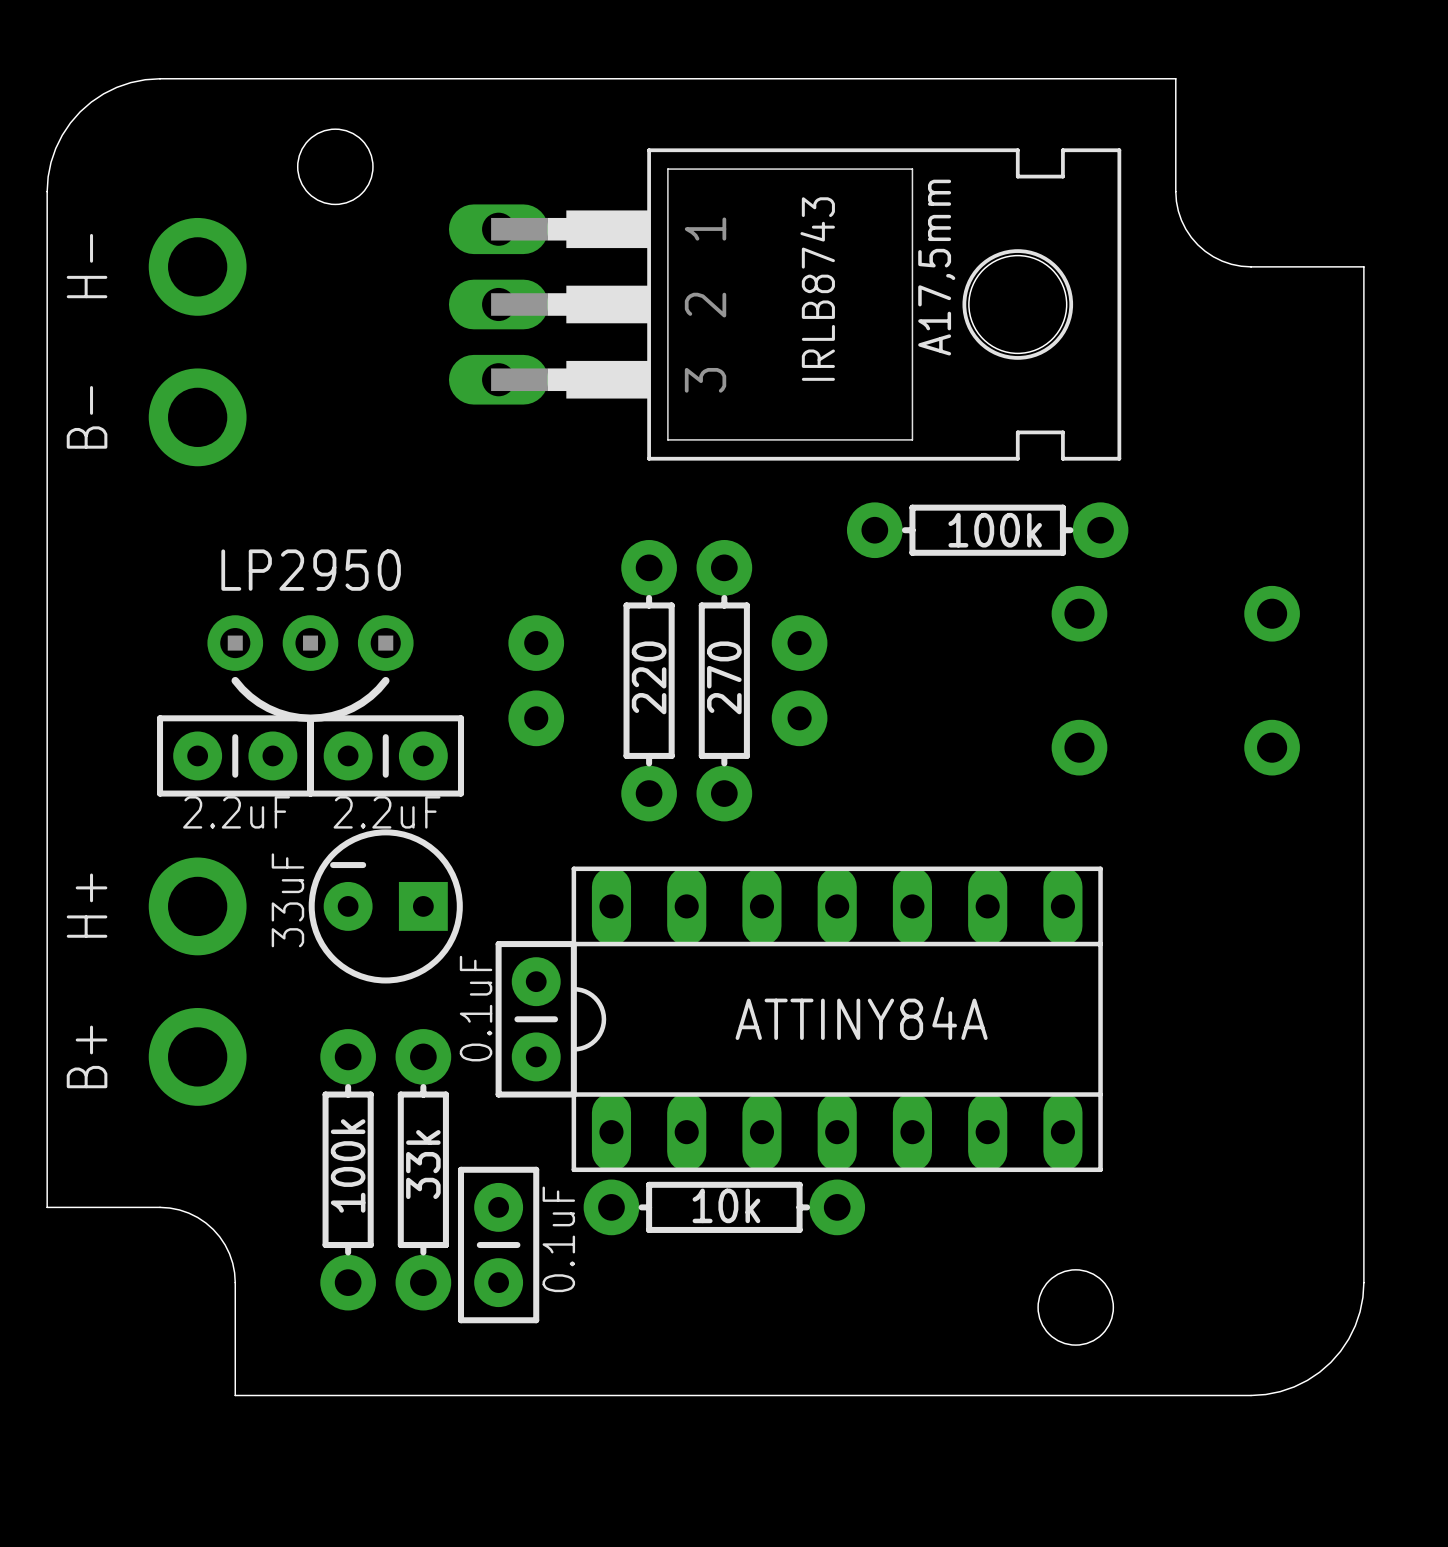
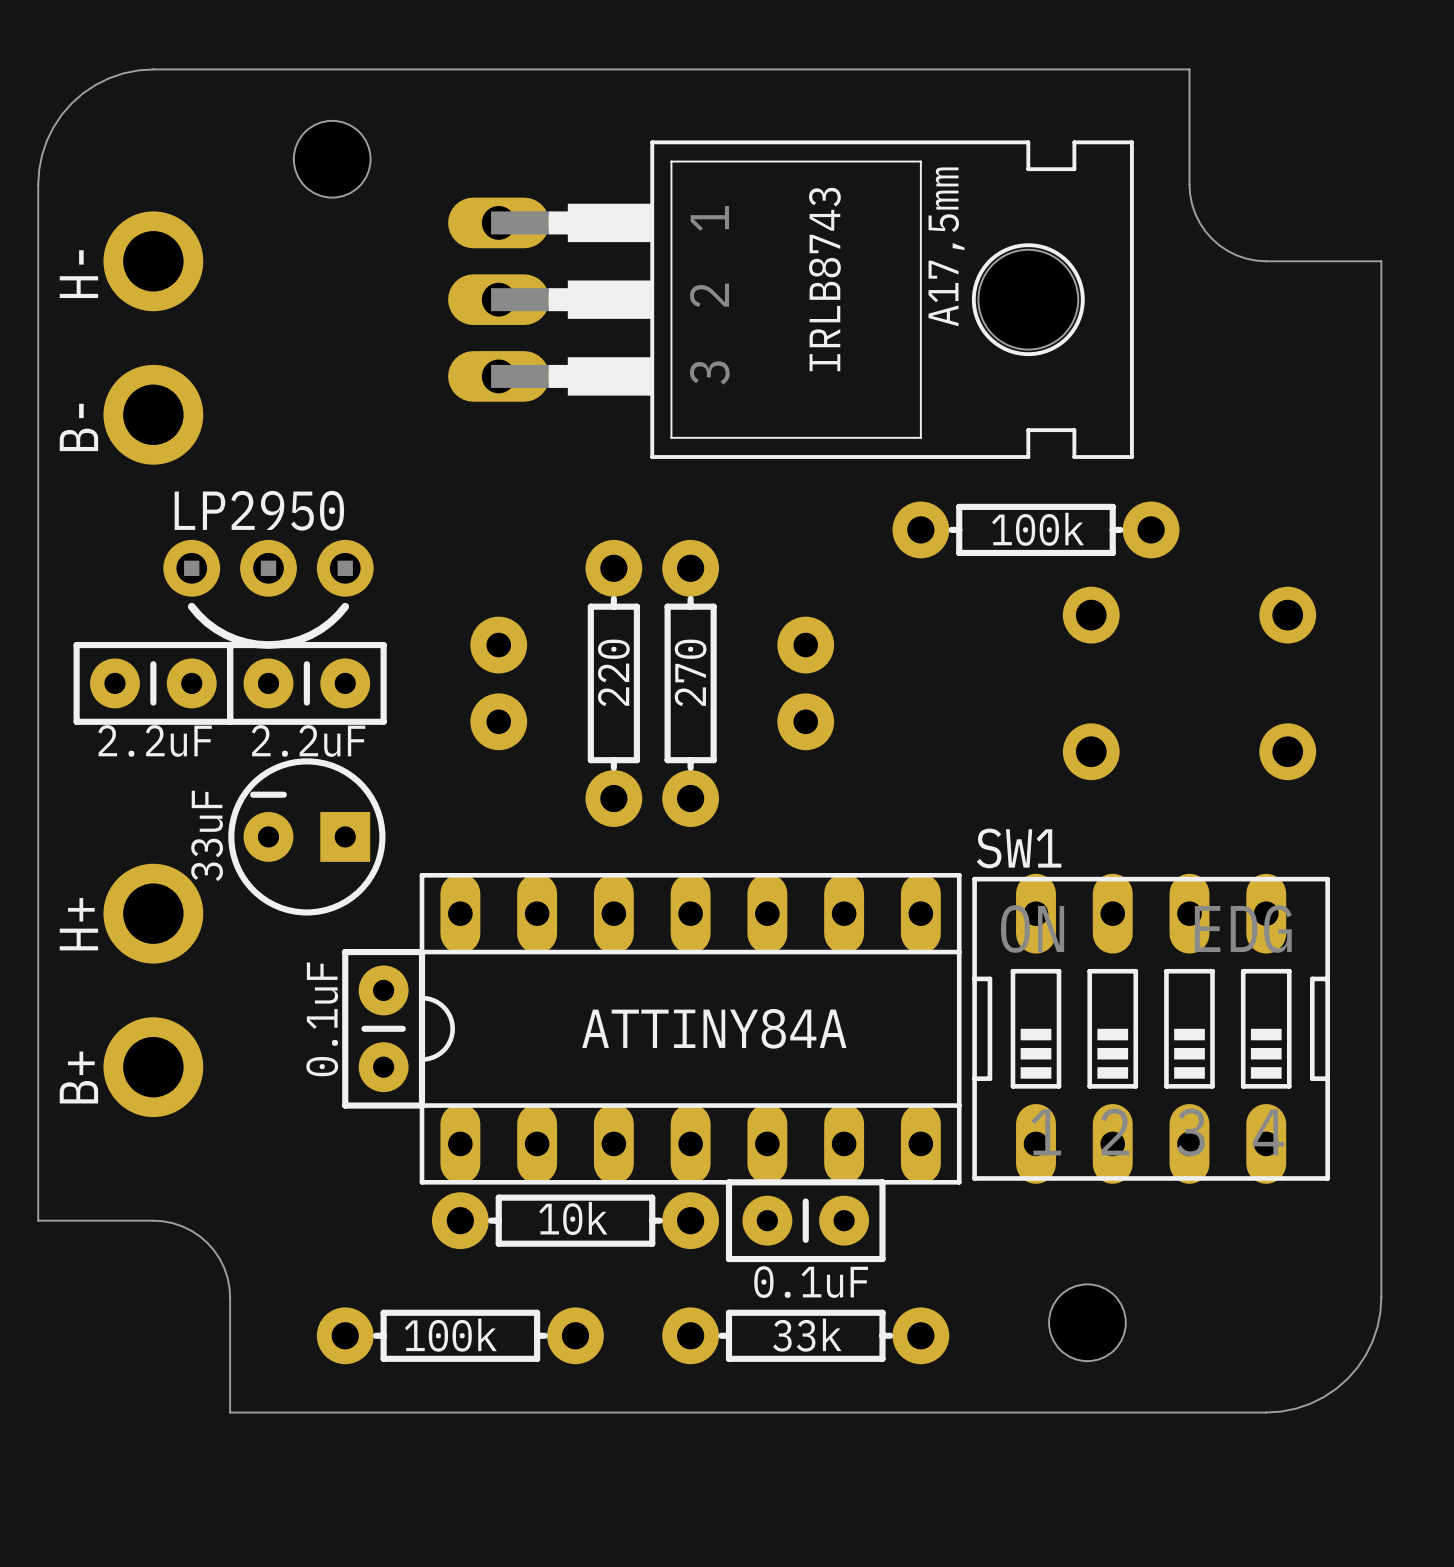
H- position: (197, 266) -> (153, 261)
B- position: (197, 417) -> (153, 414)
part position: (987, 530) -> (1035, 529)
LP2950 name position: LP2950 (311, 570) -> LP2950 (259, 510)
LP2950 position: (310, 643) -> (268, 568)
part: none -> 2.2uF (153, 683)
line: (235, 680) (250, 696) (268, 708) (288, 715) (310, 718) (332, 715) (352, 708) (370, 696) (385, 680) -> (191, 606) (207, 622) (225, 634) (246, 642) (268, 645) (290, 642) (311, 634) (329, 622) (345, 606)
part: none -> 2.2uF (306, 683)
part position: (536, 680) -> (498, 683)
part position: (649, 680) -> (613, 683)
part position: (724, 680) -> (690, 683)
part: 2.2uF (235, 755) -> none
part: 2.2uF (385, 755) -> none
H+ position: (197, 906) -> (153, 913)
part position: (385, 906) -> (306, 836)
part: none -> 0.1uF (383, 1028)
part: 0.1uF (536, 1019) -> none
ATTINY84A position: (837, 1019) -> (690, 1028)
SW1: none -> (1151, 1028)
B+ position: (197, 1056) -> (153, 1067)
part rotation: 0° (348, 1169) -> 90° clockwise (460, 1335)
part position: (348, 1169) -> (460, 1335)
part rotation: 0° (423, 1169) -> 90° clockwise (805, 1335)
part position: (423, 1169) -> (805, 1335)
part position: (724, 1207) -> (575, 1220)
part: none -> 0.1uF (805, 1220)
part: 0.1uF (498, 1245) -> none

